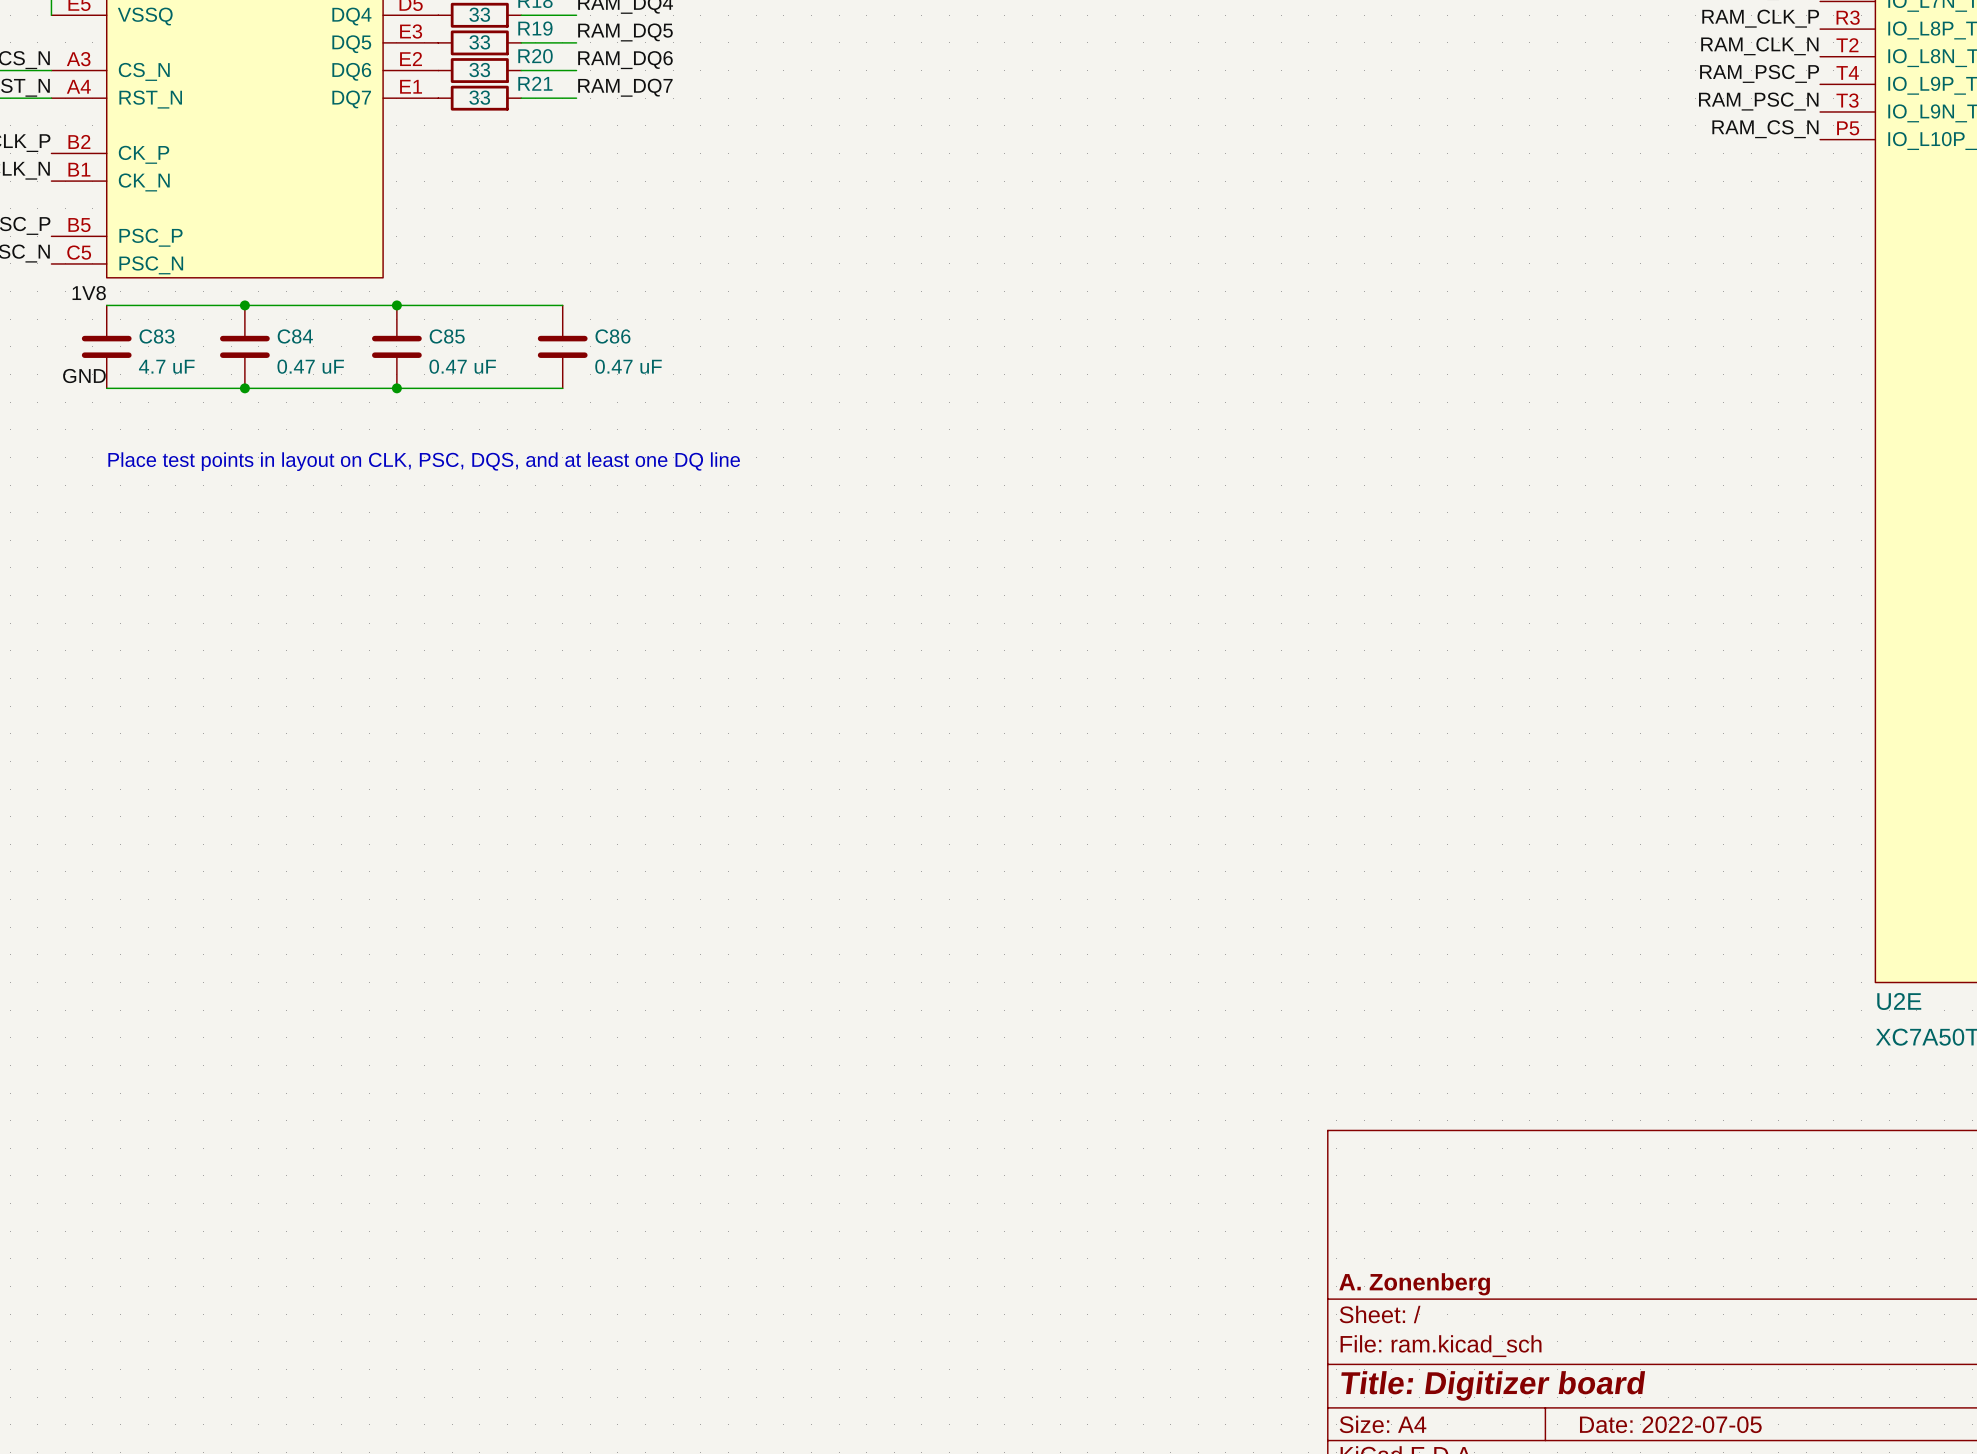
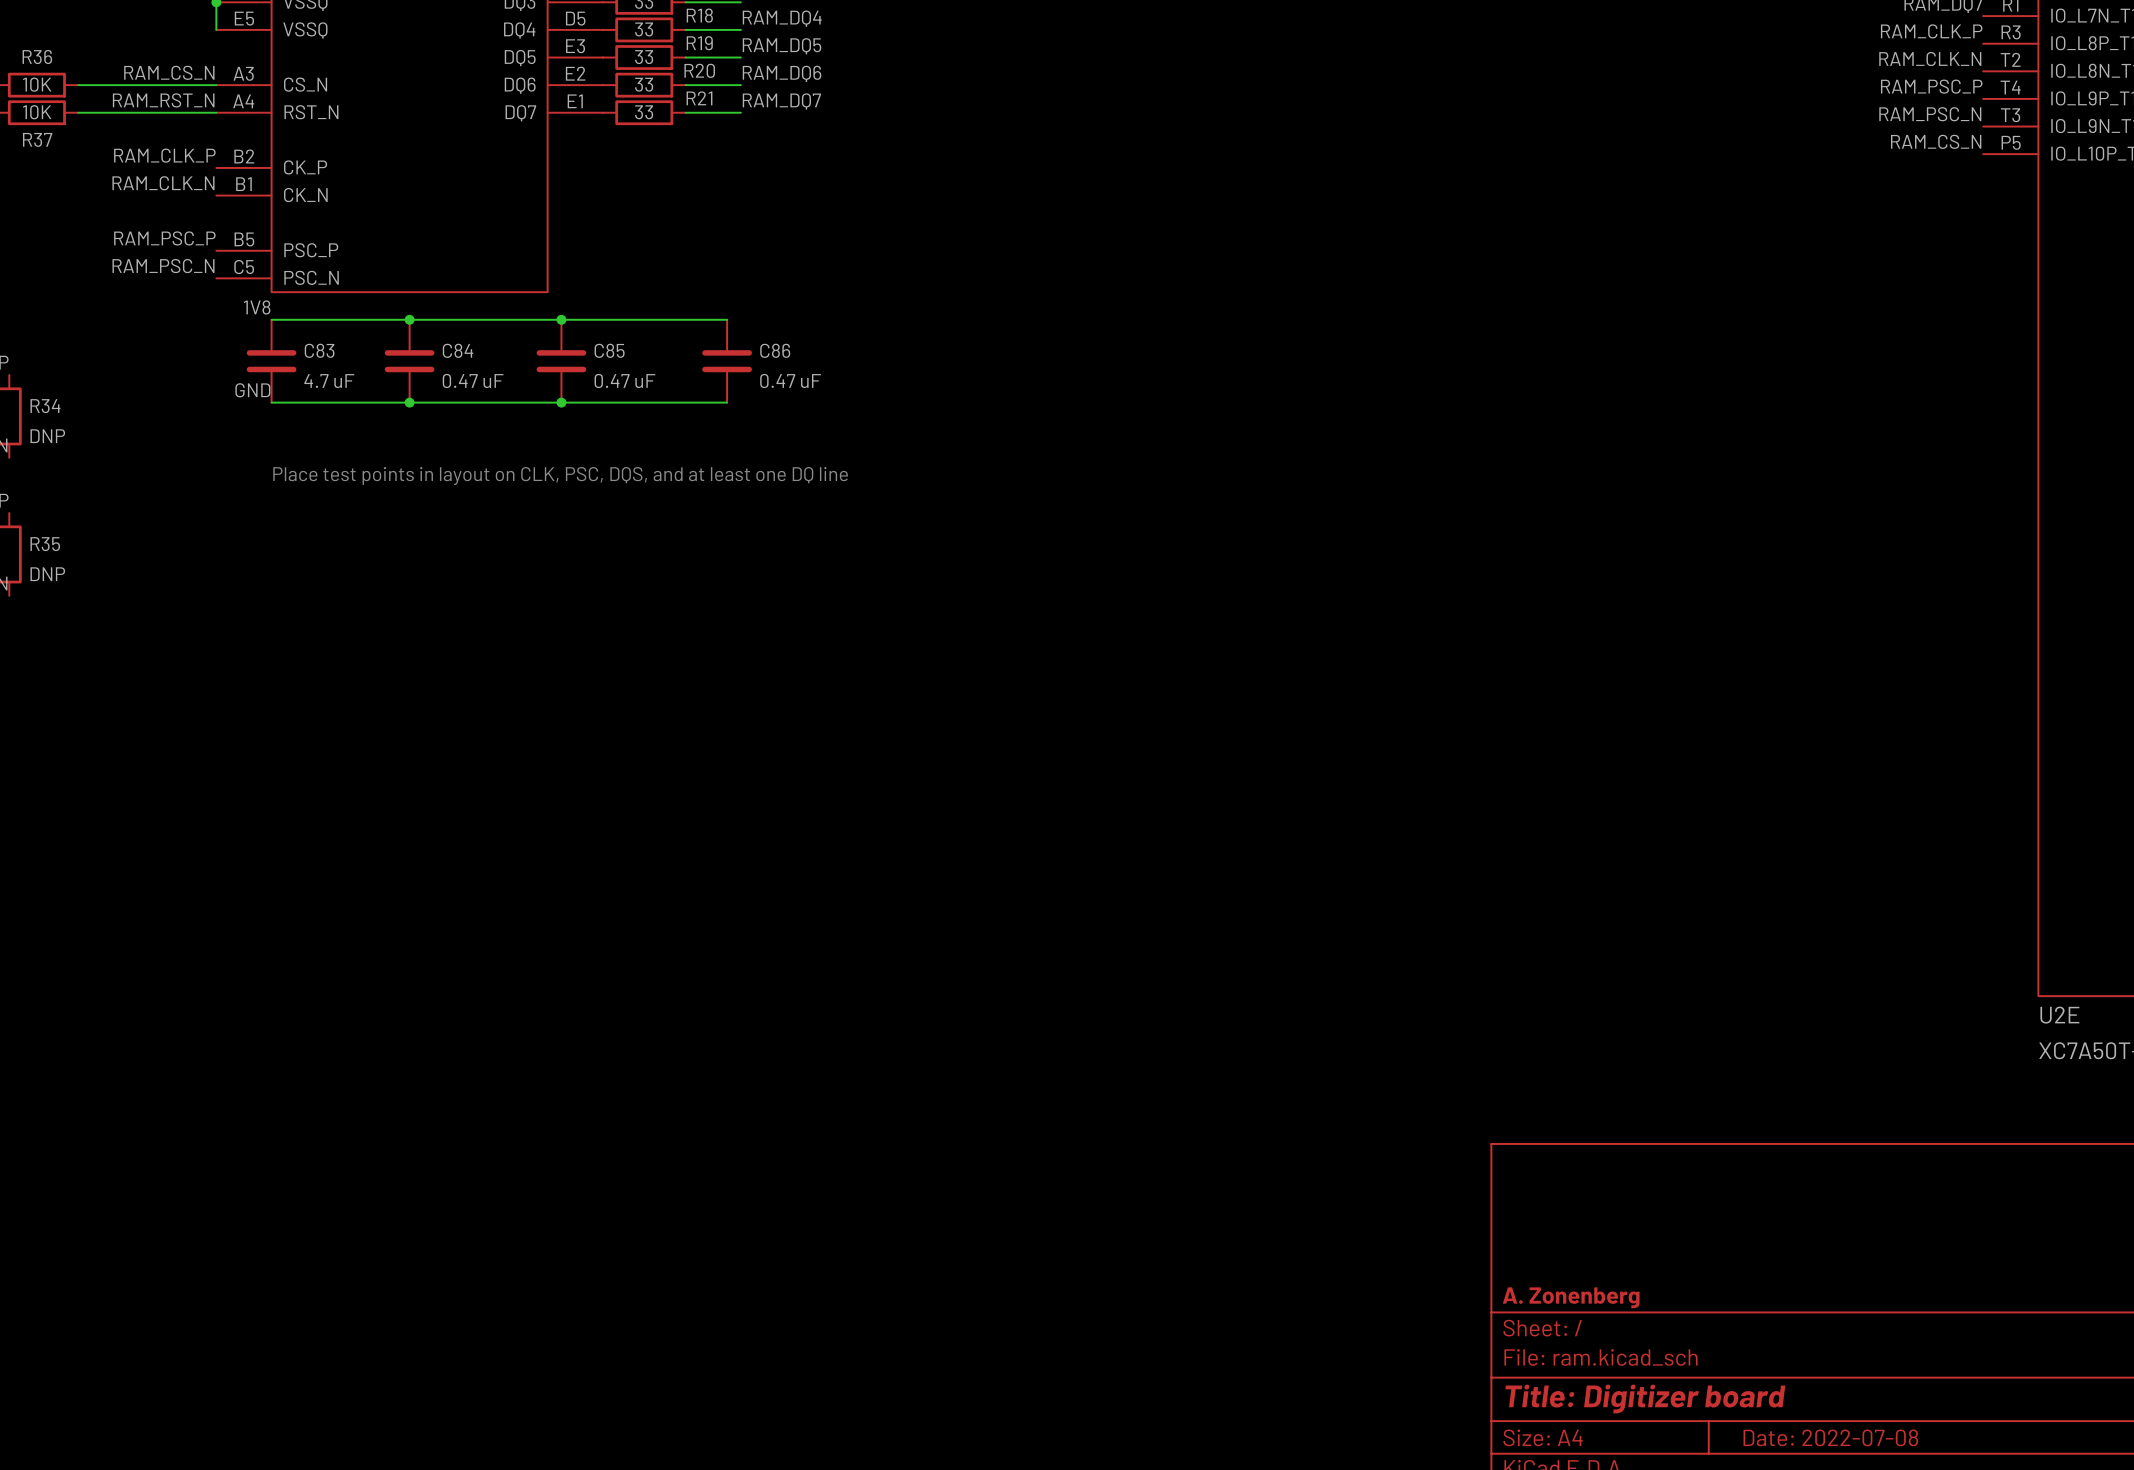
title block: Date: 2022-07-05 (1670, 1424) -> Date: 2022-07-08 (1830, 1437)

